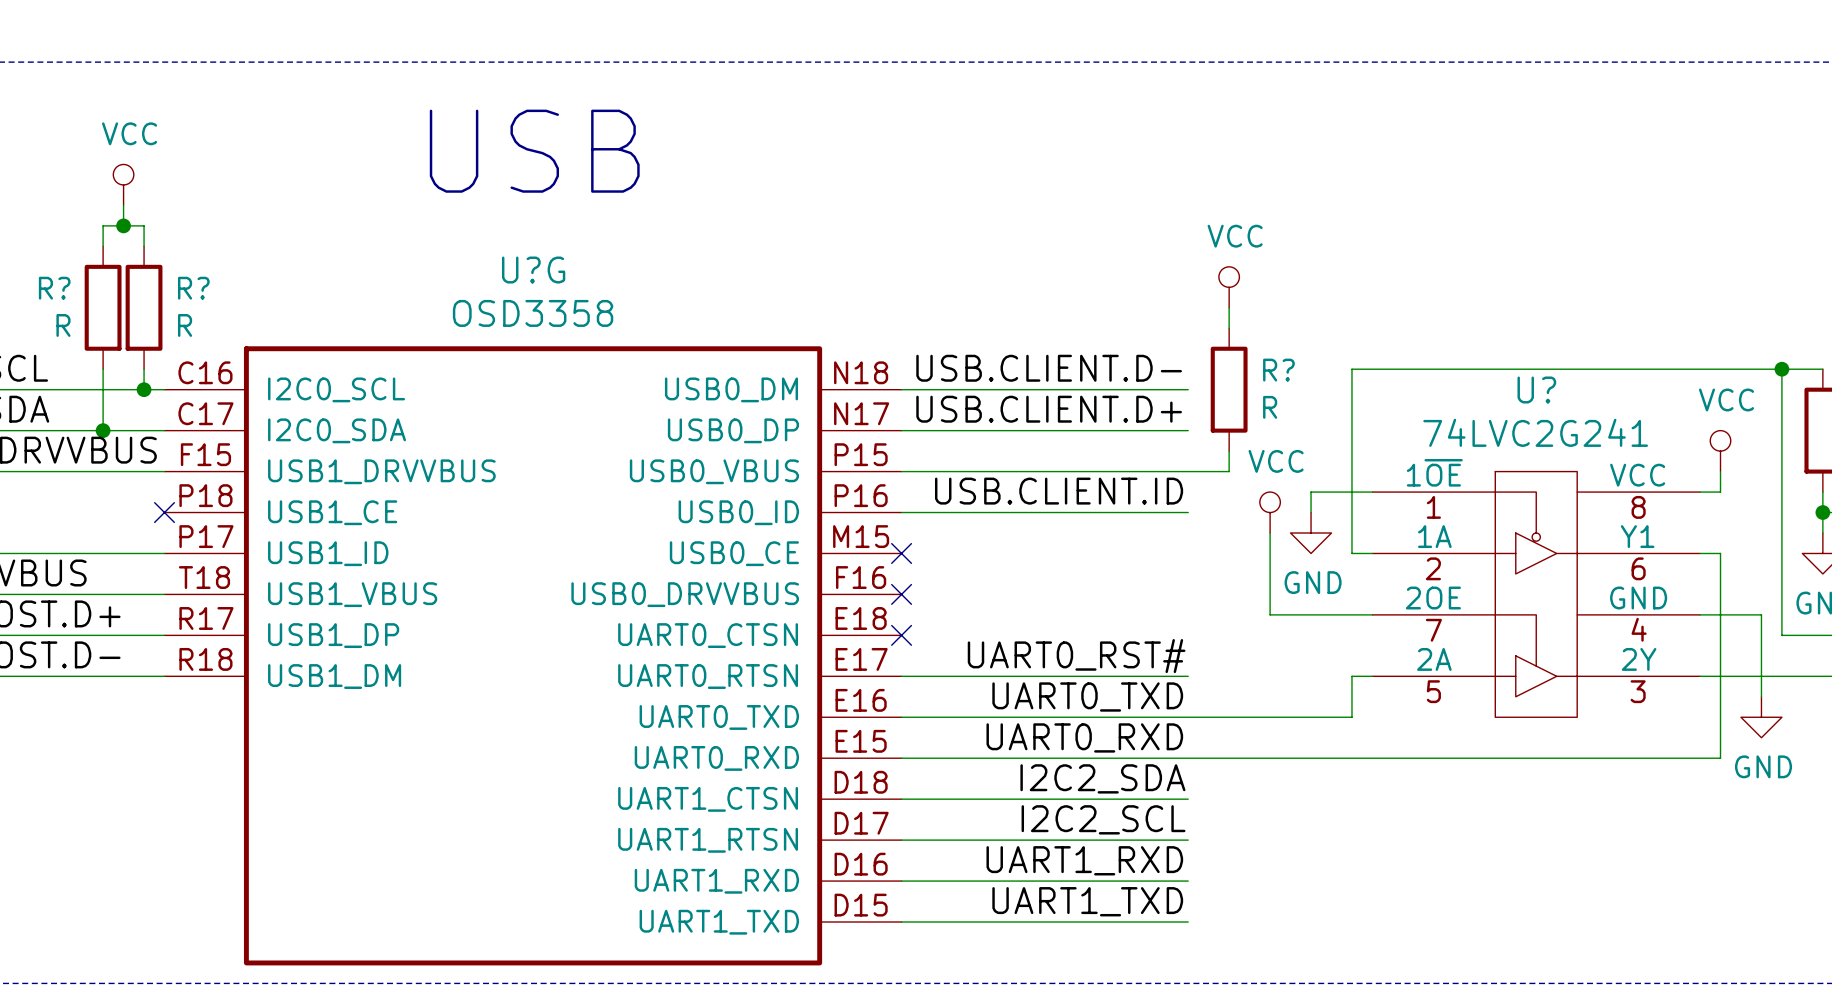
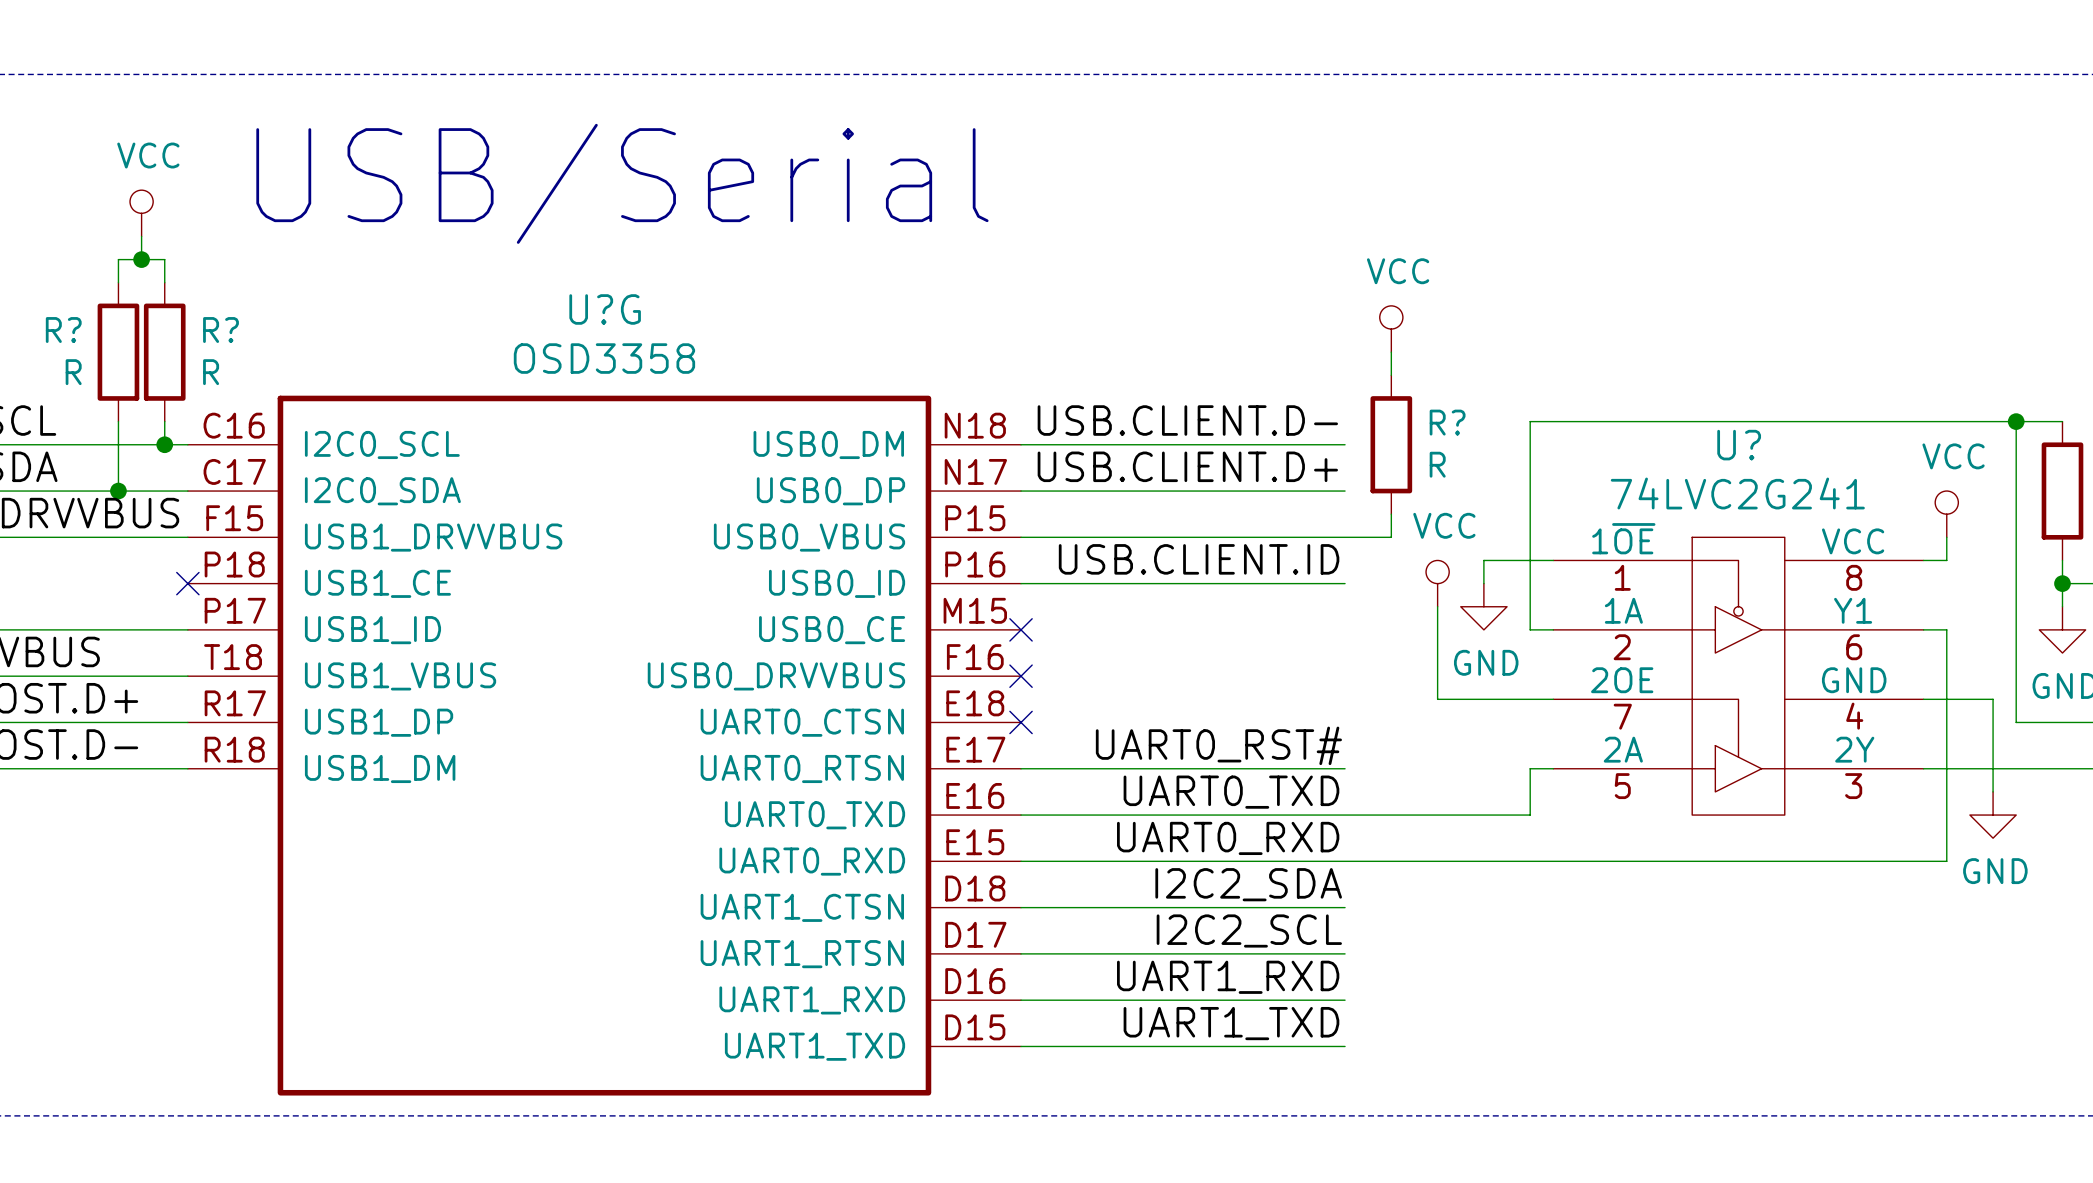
text: USB (534, 151) -> none
text: none -> USB/Serial (622, 183)

